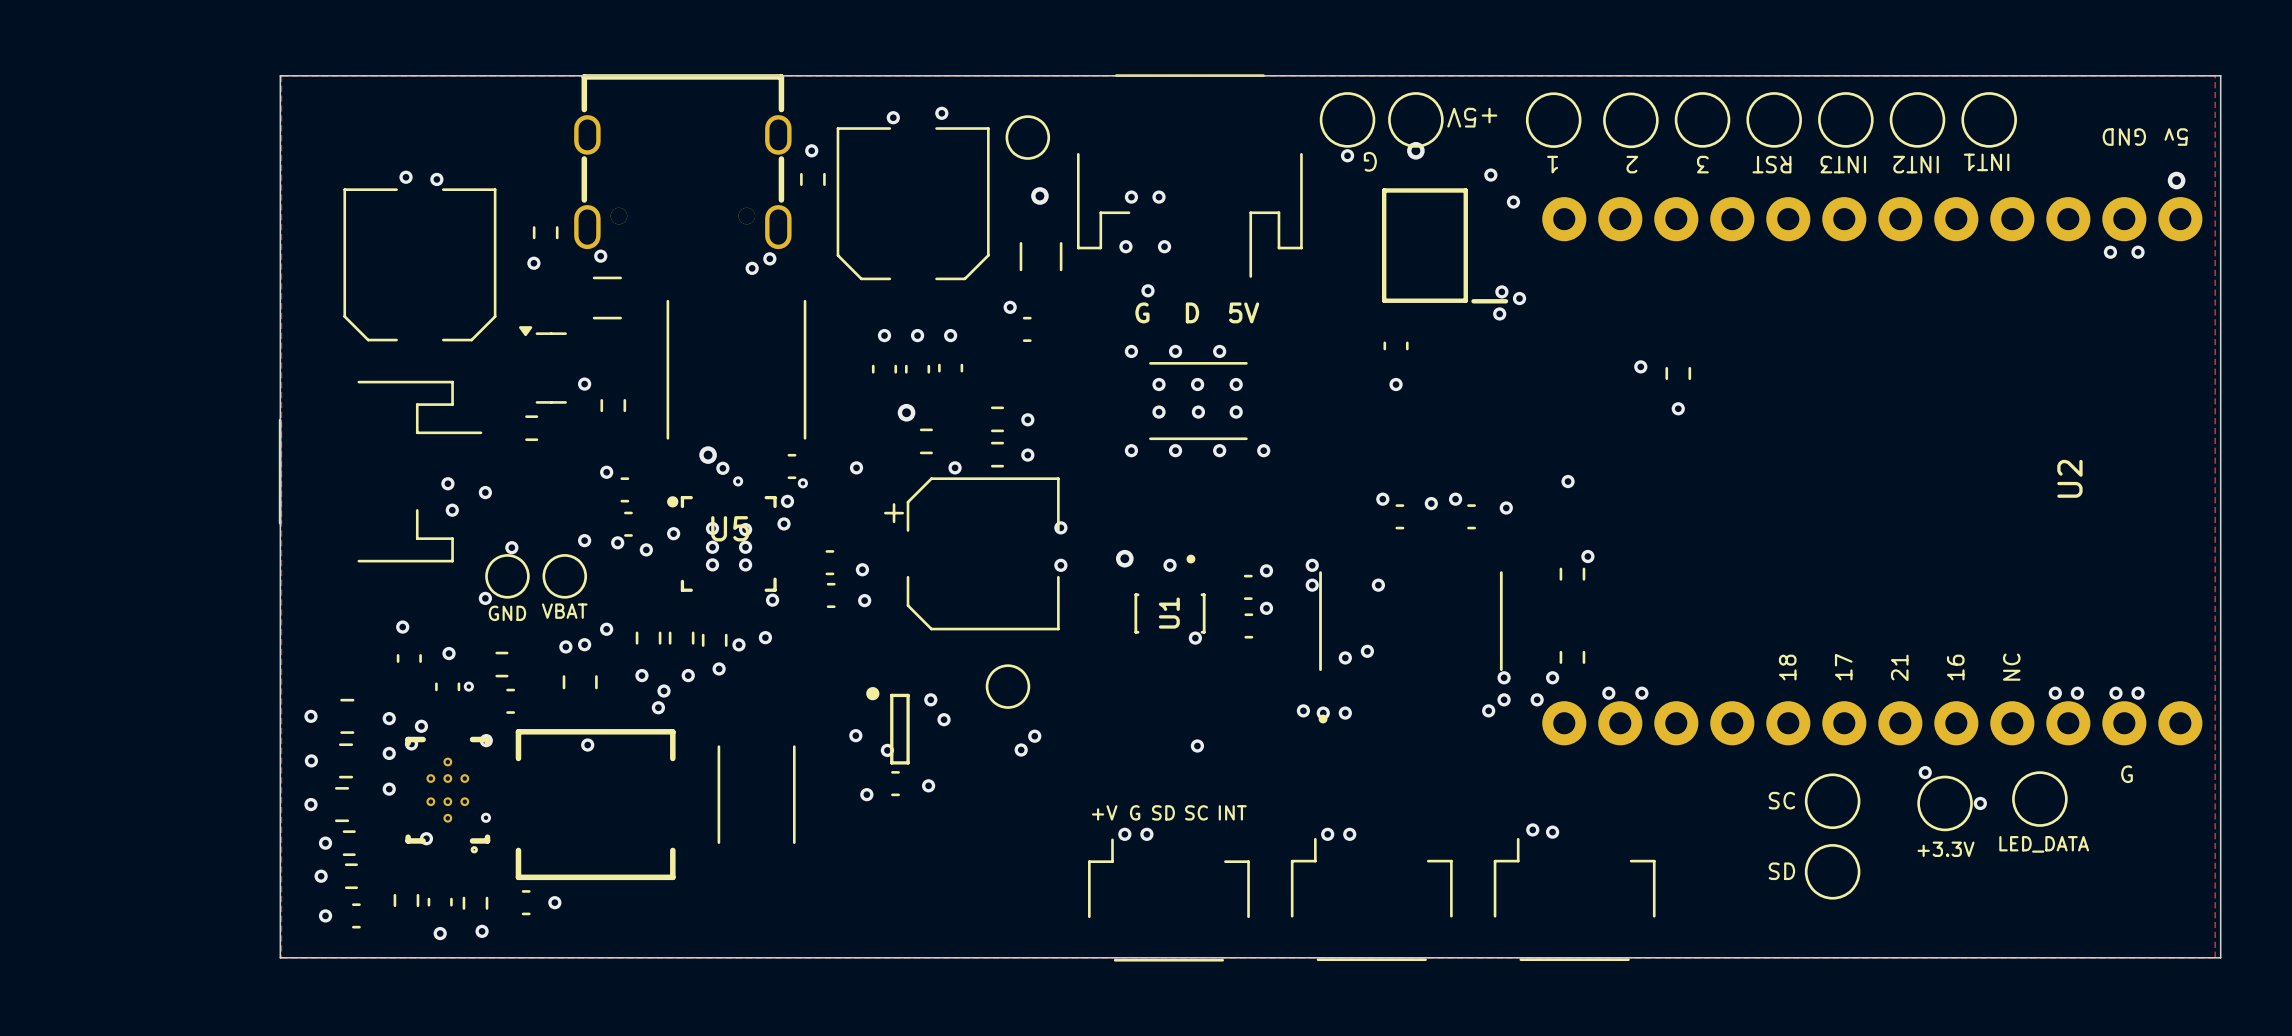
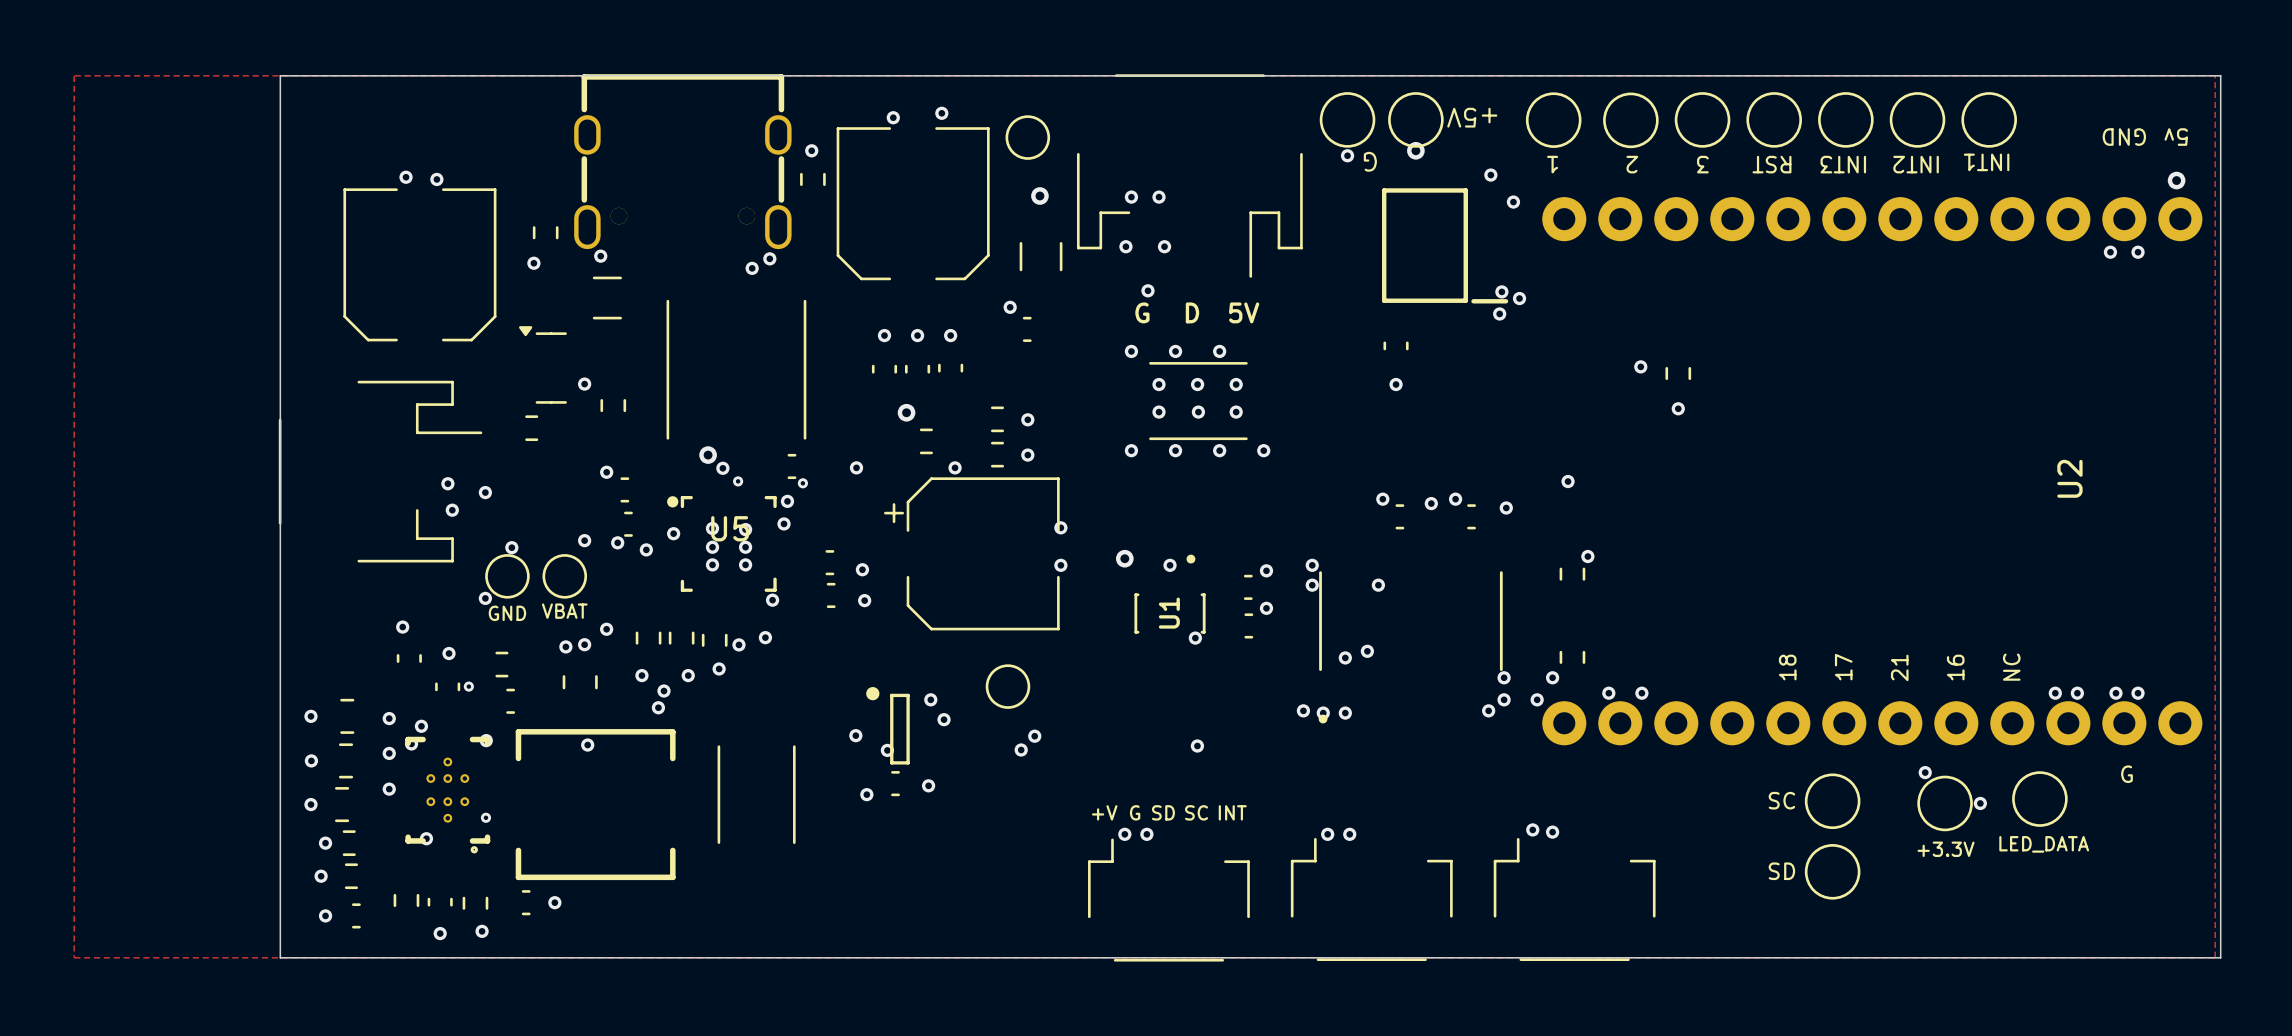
zone outline: (281, 75) (281, 957) -> (281, 75) (74, 75) (74, 957) (281, 957)

